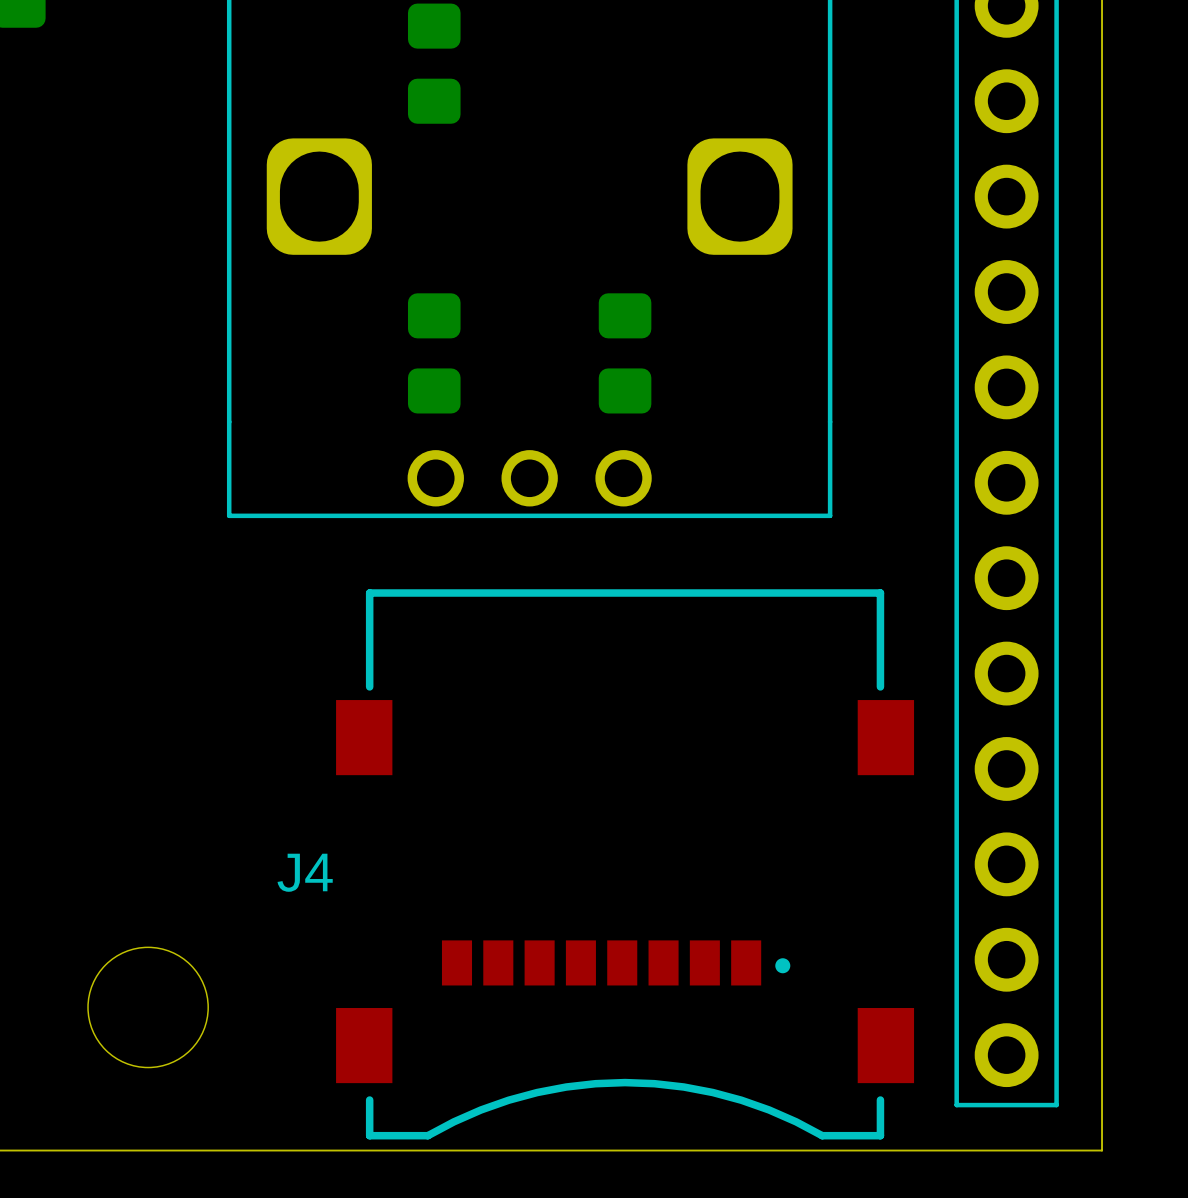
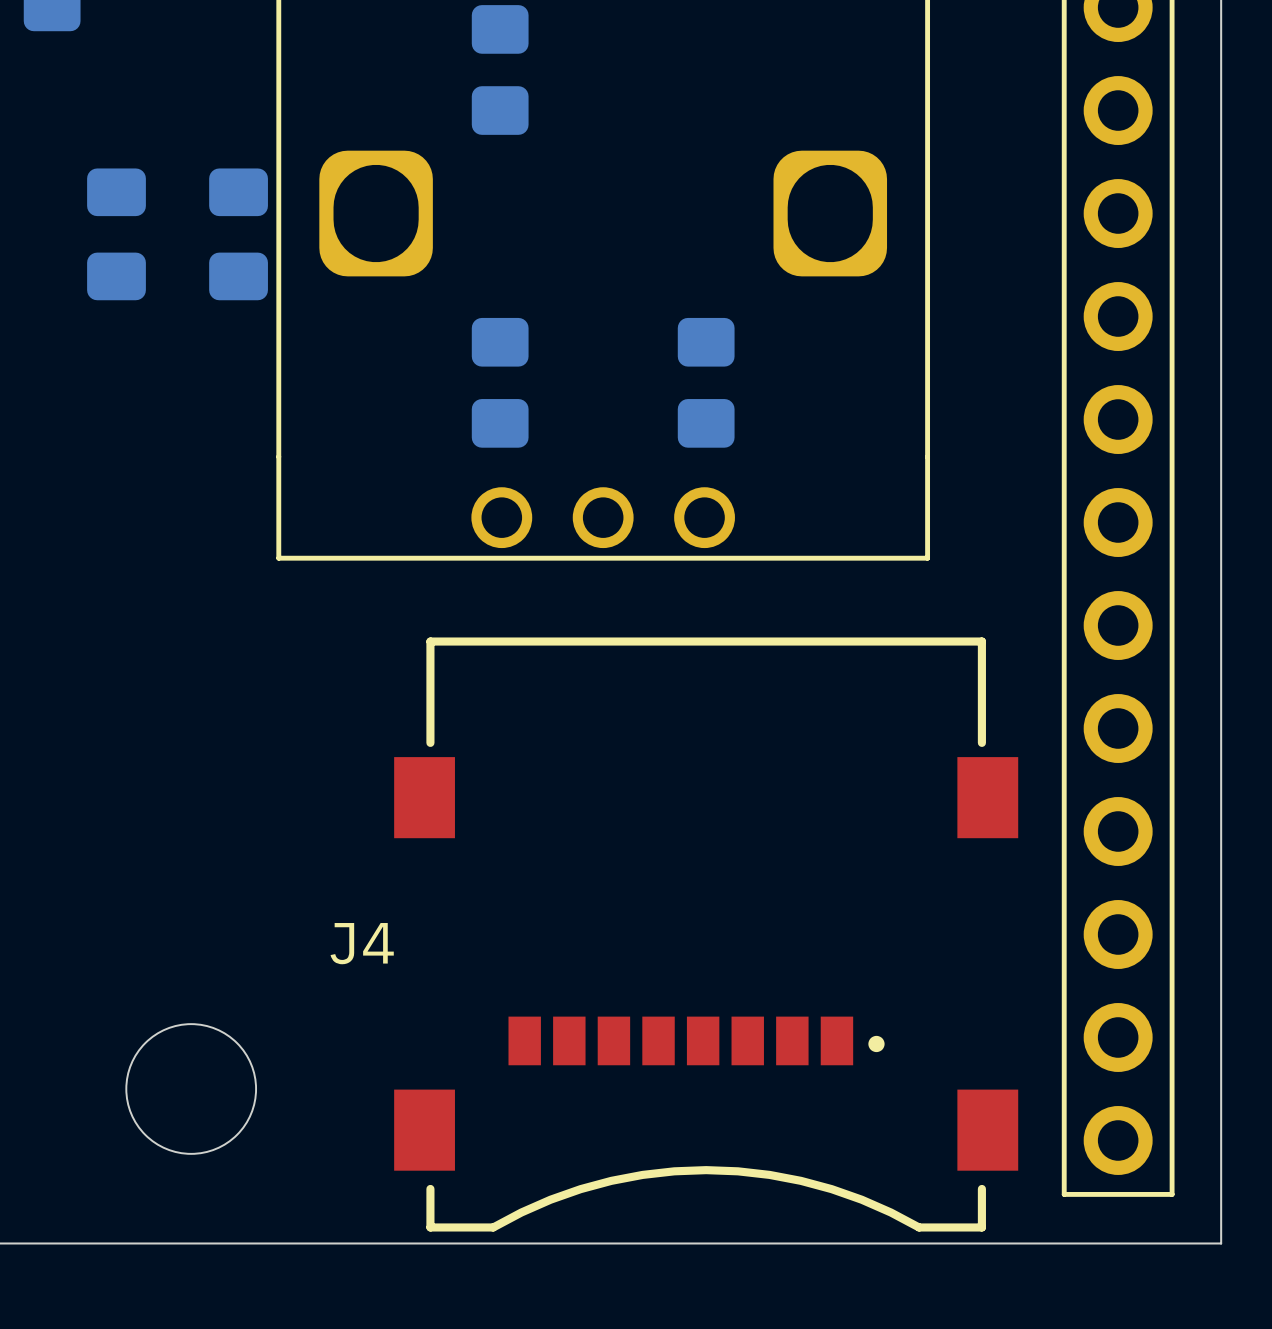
part: none -> (116, 234)
part: none -> (238, 234)

